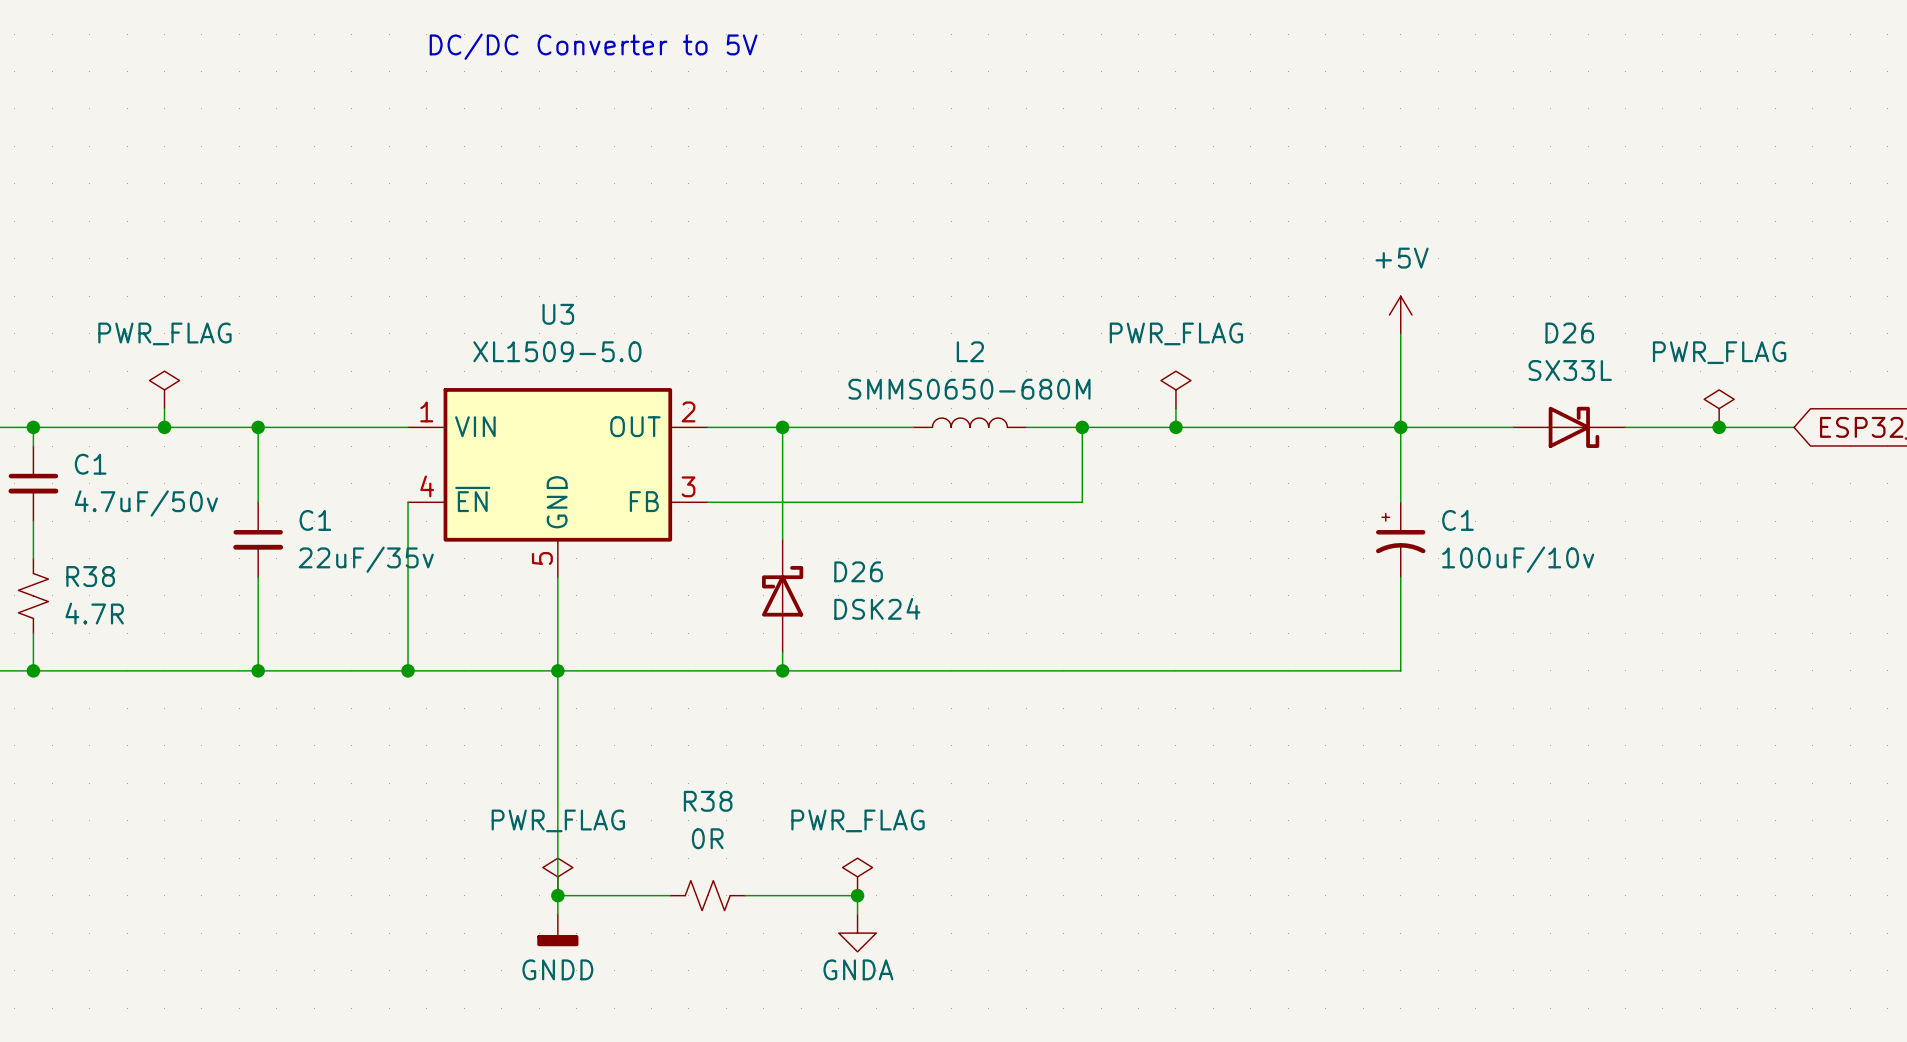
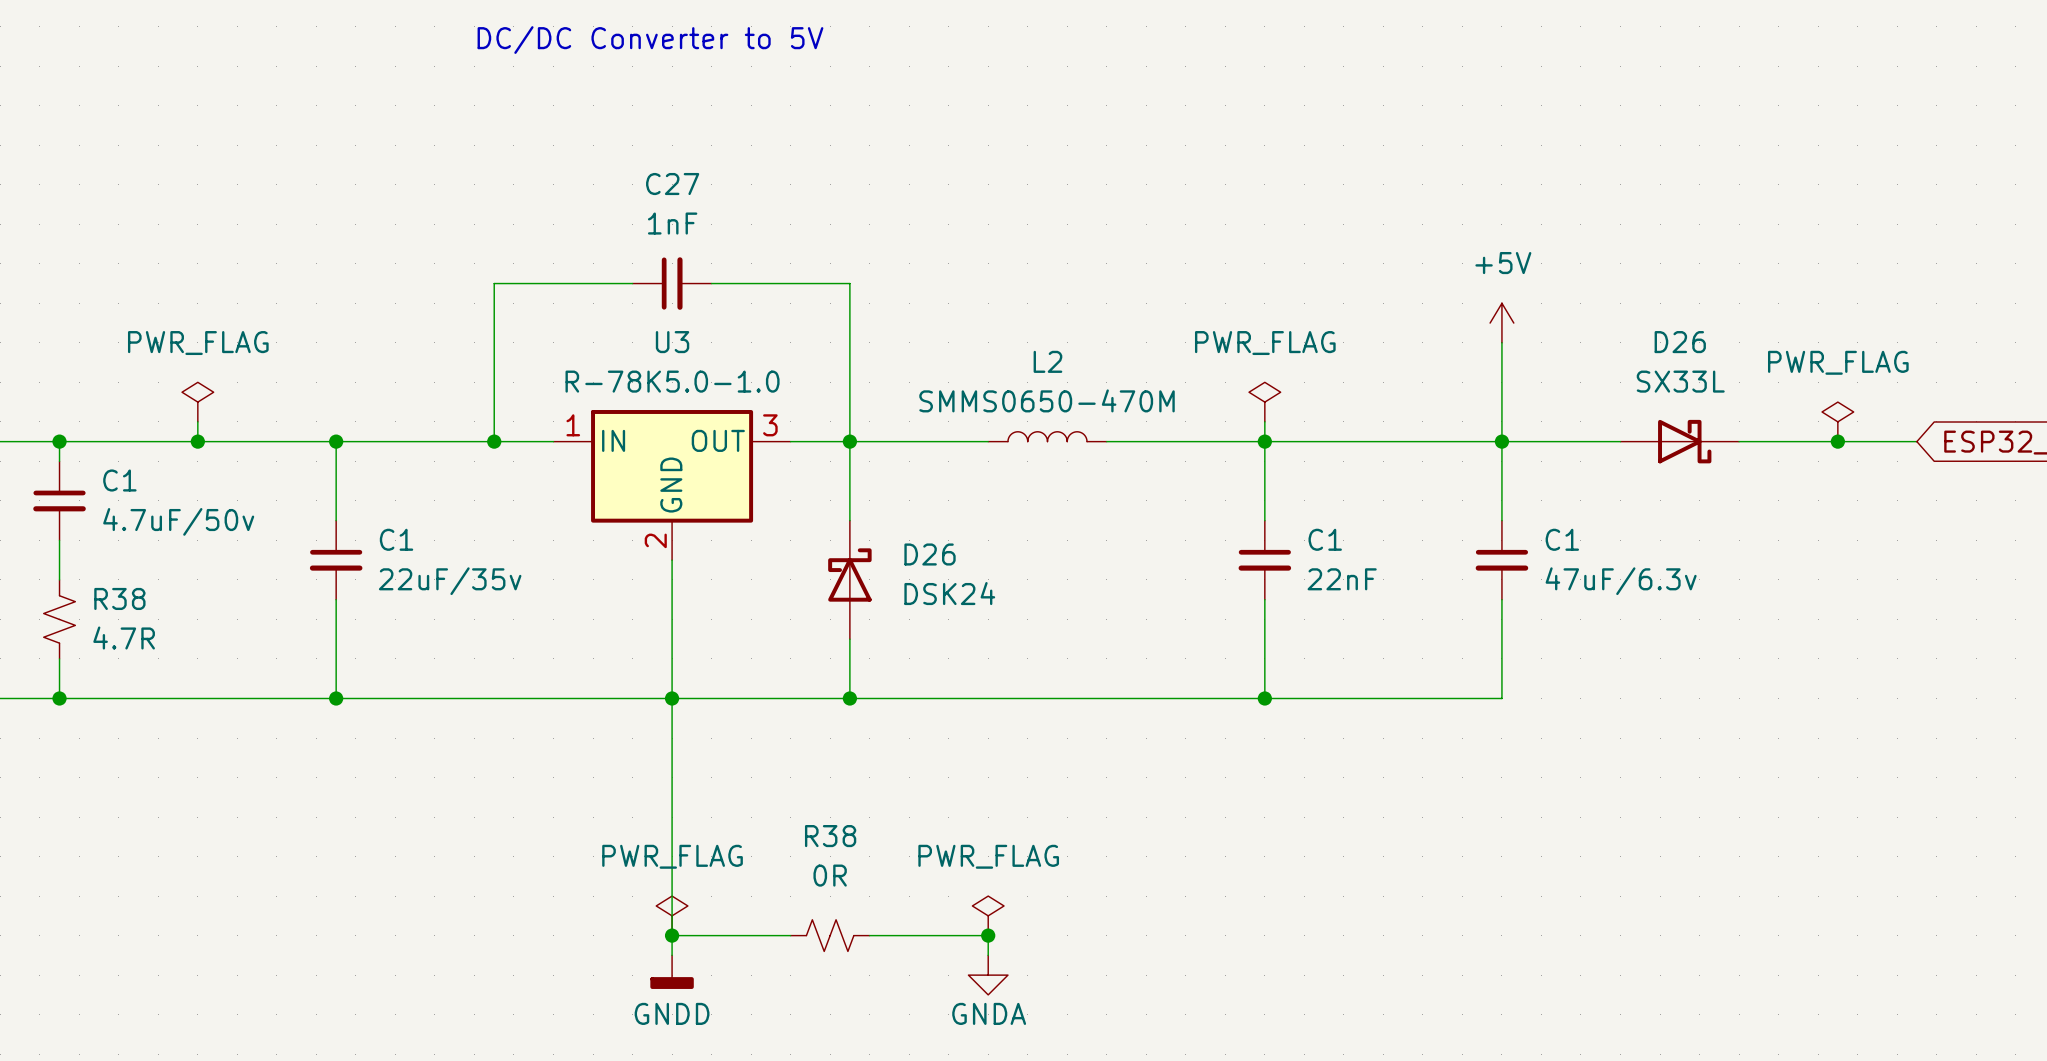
wire: none -> (632, 283) (494, 283) (494, 441)
C27: none -> 1nF (672, 283)
wire: none -> (711, 283) (849, 283) (849, 441)
U3 name position: U3 (558, 314) -> U3 (672, 342)
U3 value: XL1509-5.0 (557, 351) -> R-78K5.0-1.0 (672, 381)
U3 symbol: [408, 388, 708, 578] -> [553, 410, 791, 561]
L2 value: SMMS0650-680M (969, 389) -> SMMS0650-470M (1047, 400)
wire: (258, 427) (258, 502) -> (336, 441) (336, 520)
junction position: (258, 427) -> (336, 441)
junction: none -> (494, 441)
wire: (1082, 427) (1082, 502) (707, 502) -> none
junction: (1082, 427) -> none
wire: none -> (1264, 441) (1264, 520)
wire: (408, 502) (408, 670) -> none
C1 symbol: [1376, 502, 1426, 578] -> [1475, 520, 1529, 600]
C1 position: (258, 539) -> (336, 560)
wire: none -> (672, 560) (672, 955)
C1: none -> 22nF (1264, 560)
C1 value: 100uF/10v (1518, 559) -> 47uF/6.3v (1621, 581)
wire: (258, 577) (258, 670) -> (336, 599) (336, 698)
wire: (557, 577) (557, 914) -> none
wire: none -> (1264, 599) (1264, 698)
D26 position: (782, 595) -> (849, 579)
junction position: (258, 670) -> (336, 698)
junction: (408, 670) -> none
junction position: (557, 670) -> (672, 698)
junction: none -> (1264, 698)
power symbol position: PWR_FLAG (557, 876) -> PWR_FLAG (672, 915)
power symbol position: PWR_FLAG (857, 876) -> PWR_FLAG (988, 915)
wire: (557, 895) (614, 895) -> none
junction position: (557, 895) -> (672, 935)
R38 position: (707, 895) -> (830, 935)
wire: (745, 895) (801, 895) -> (731, 935) (790, 935)
wire: (857, 895) (857, 914) -> (928, 935) (988, 935) (988, 955)
junction position: (857, 895) -> (988, 935)
power symbol position: GNDD (557, 930) -> GNDD (672, 972)
power symbol position: GNDA (857, 933) -> GNDA (988, 975)

